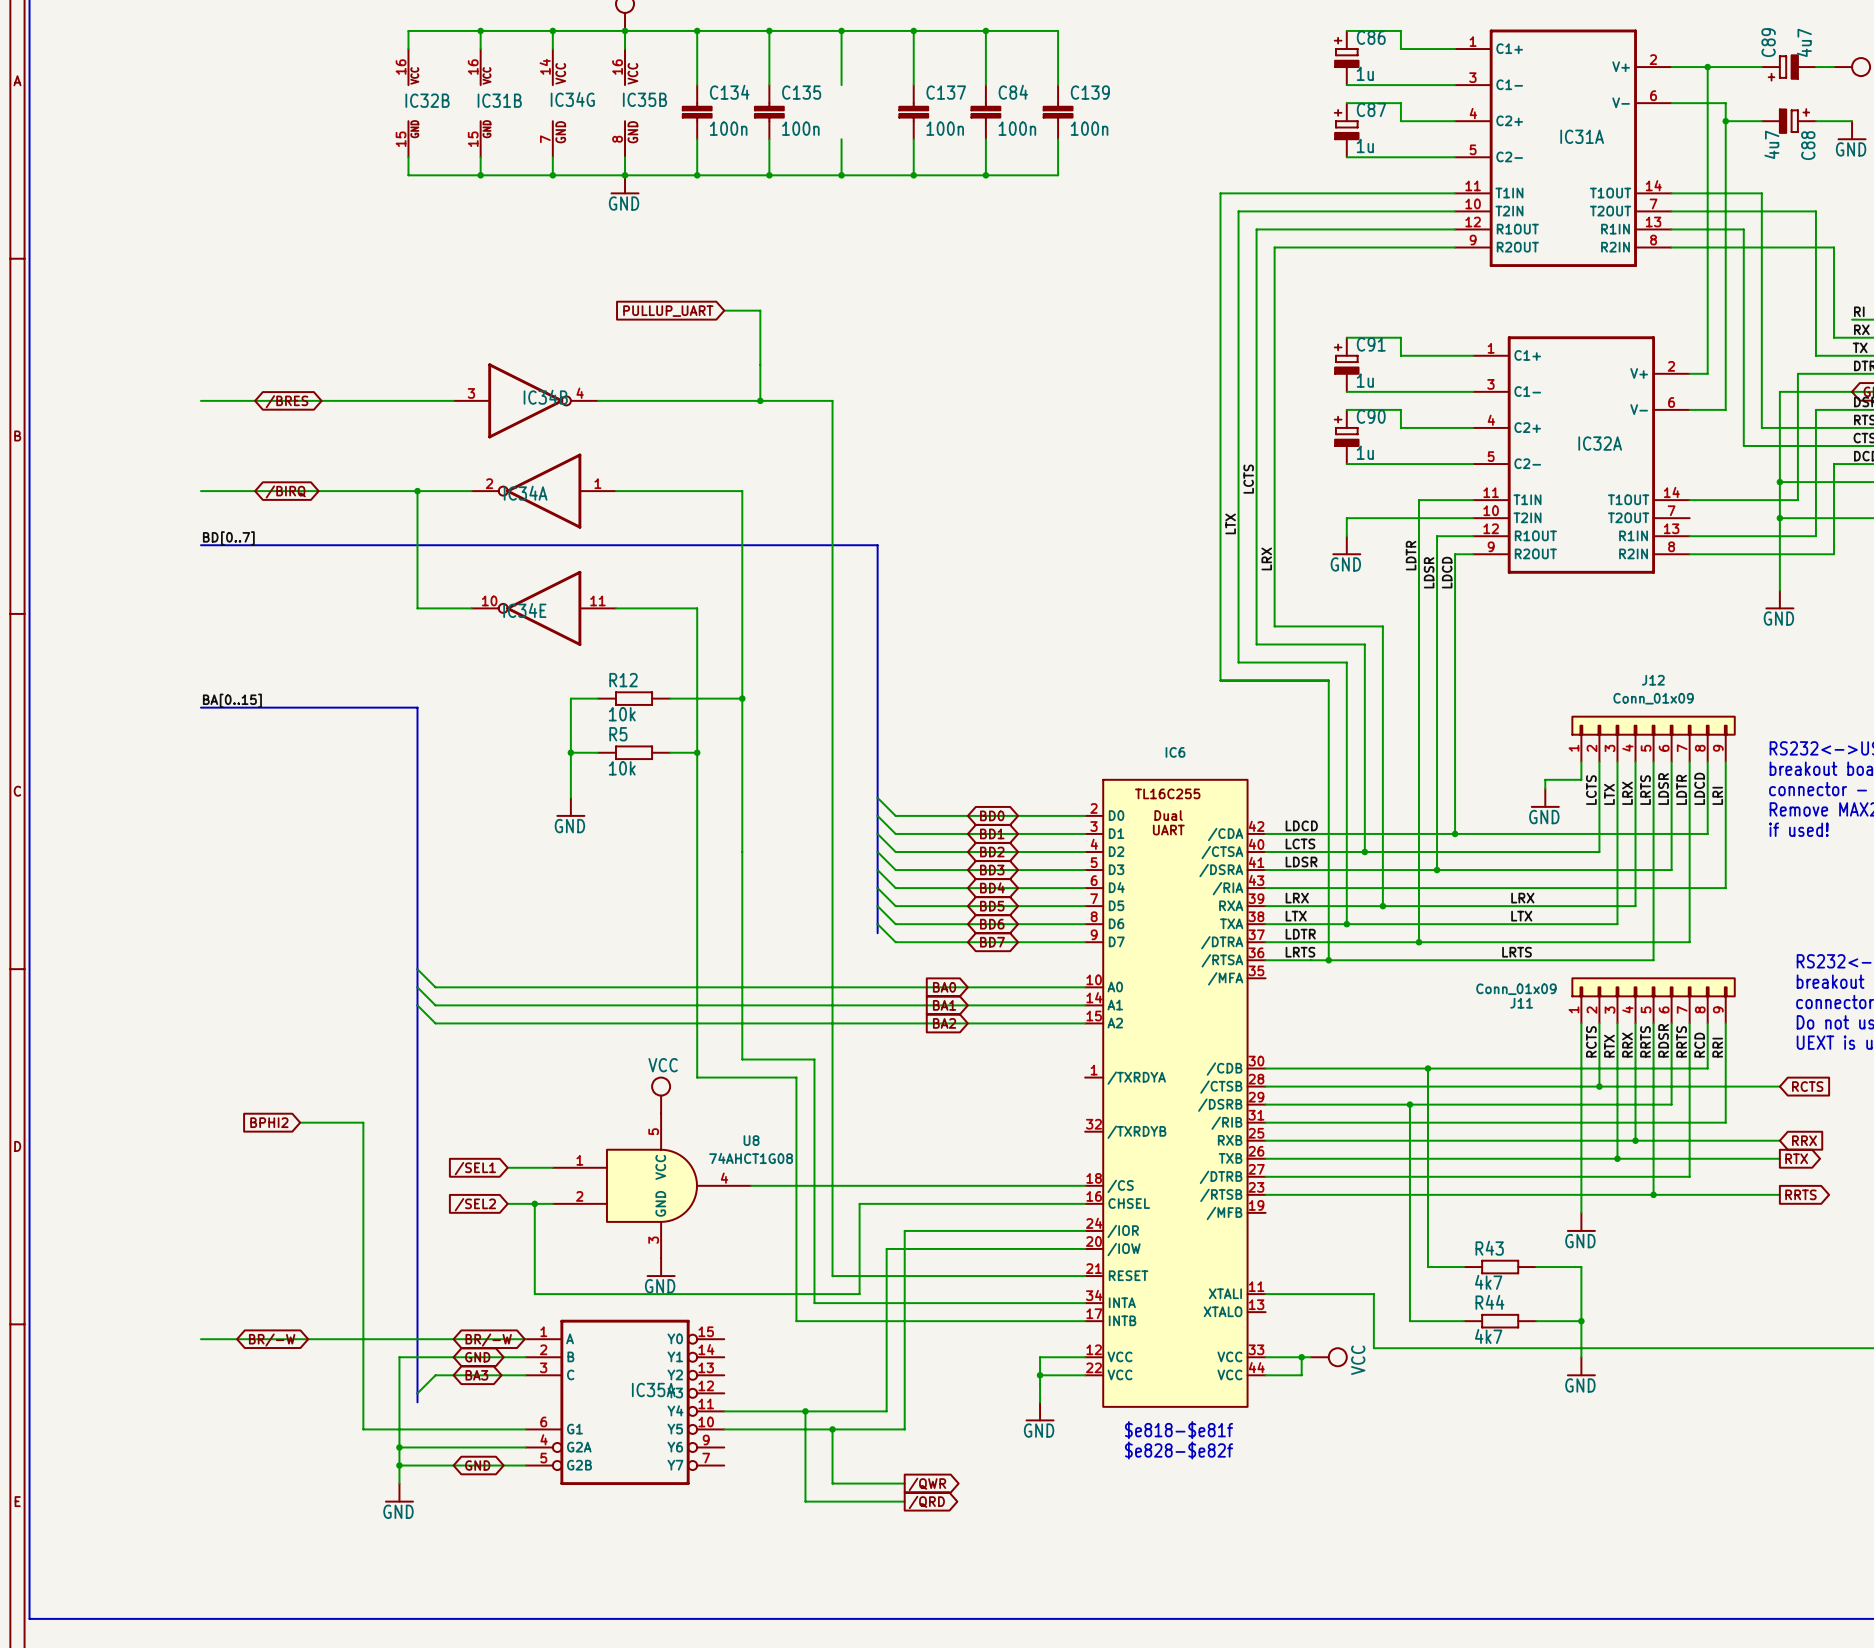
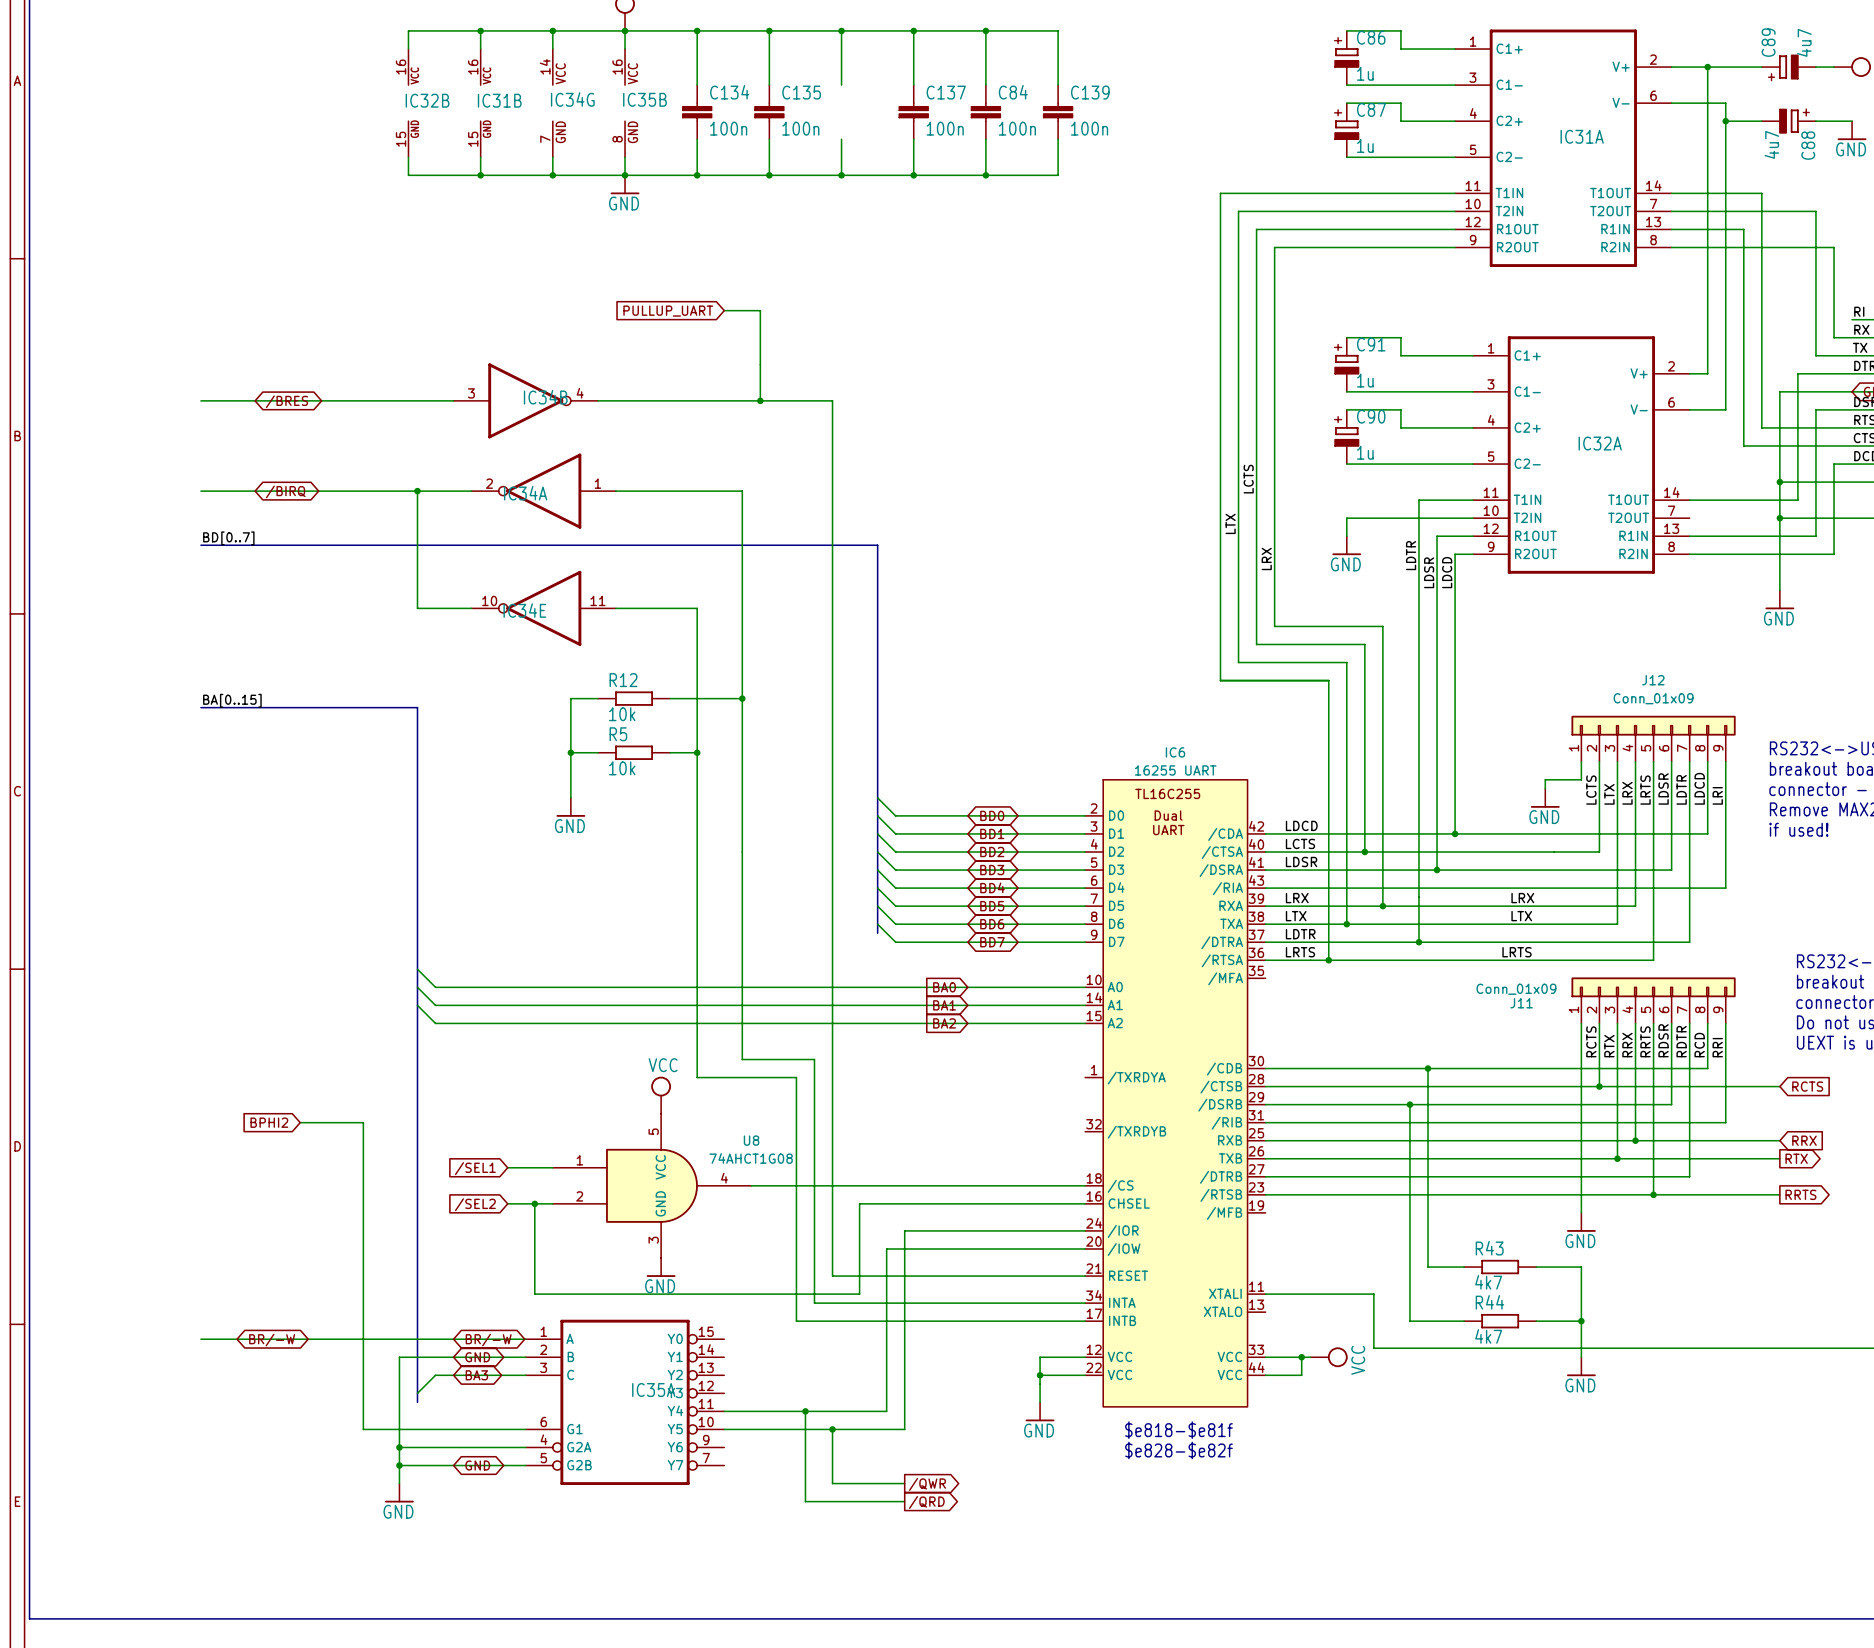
IC6 value: none -> 16255 UART (1175, 770)
label: RRTS (1681, 1041) -> RDTR (1681, 1041)

